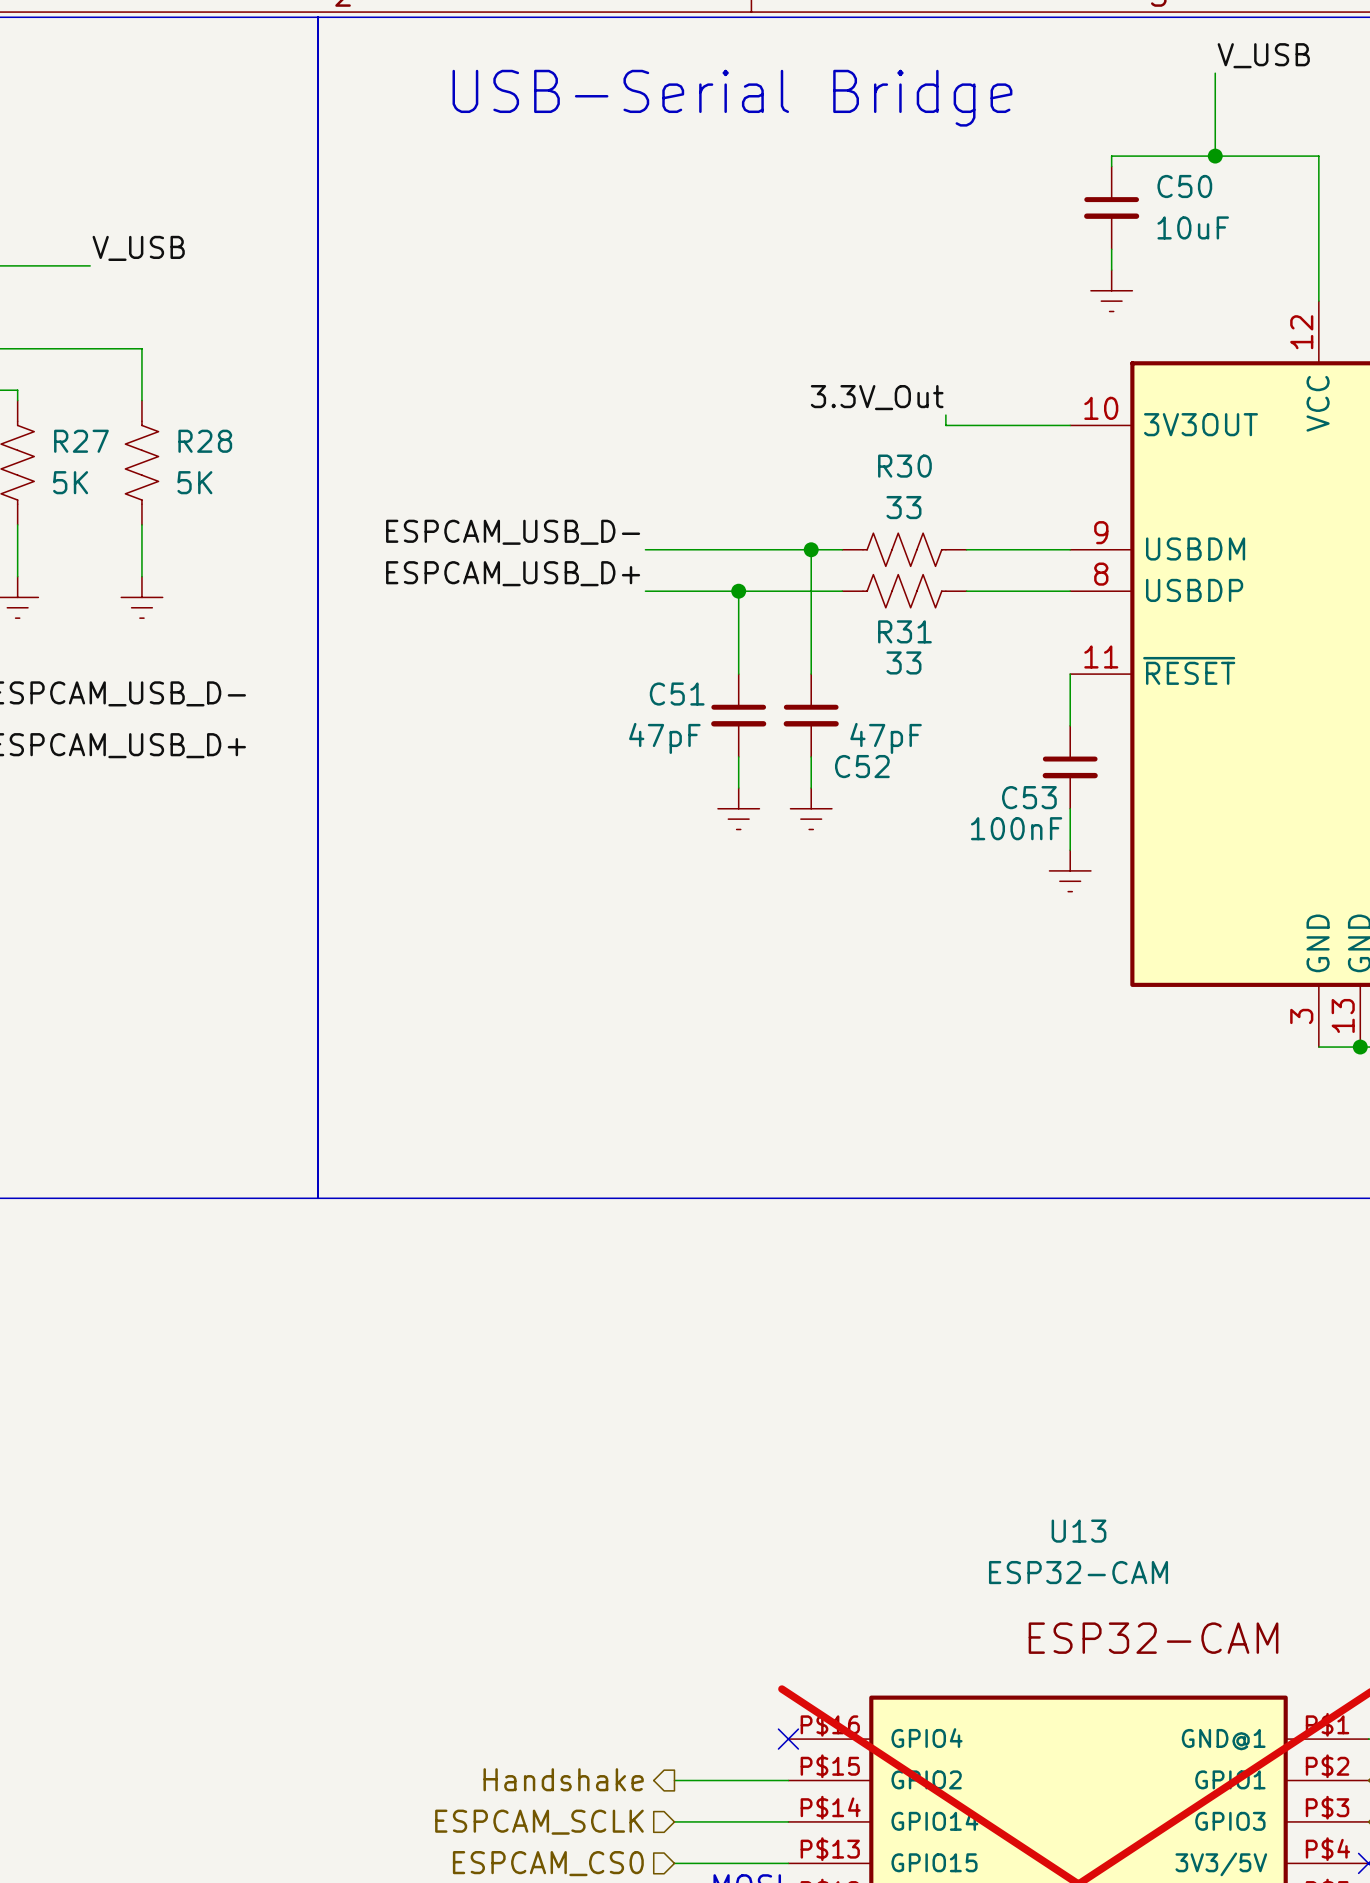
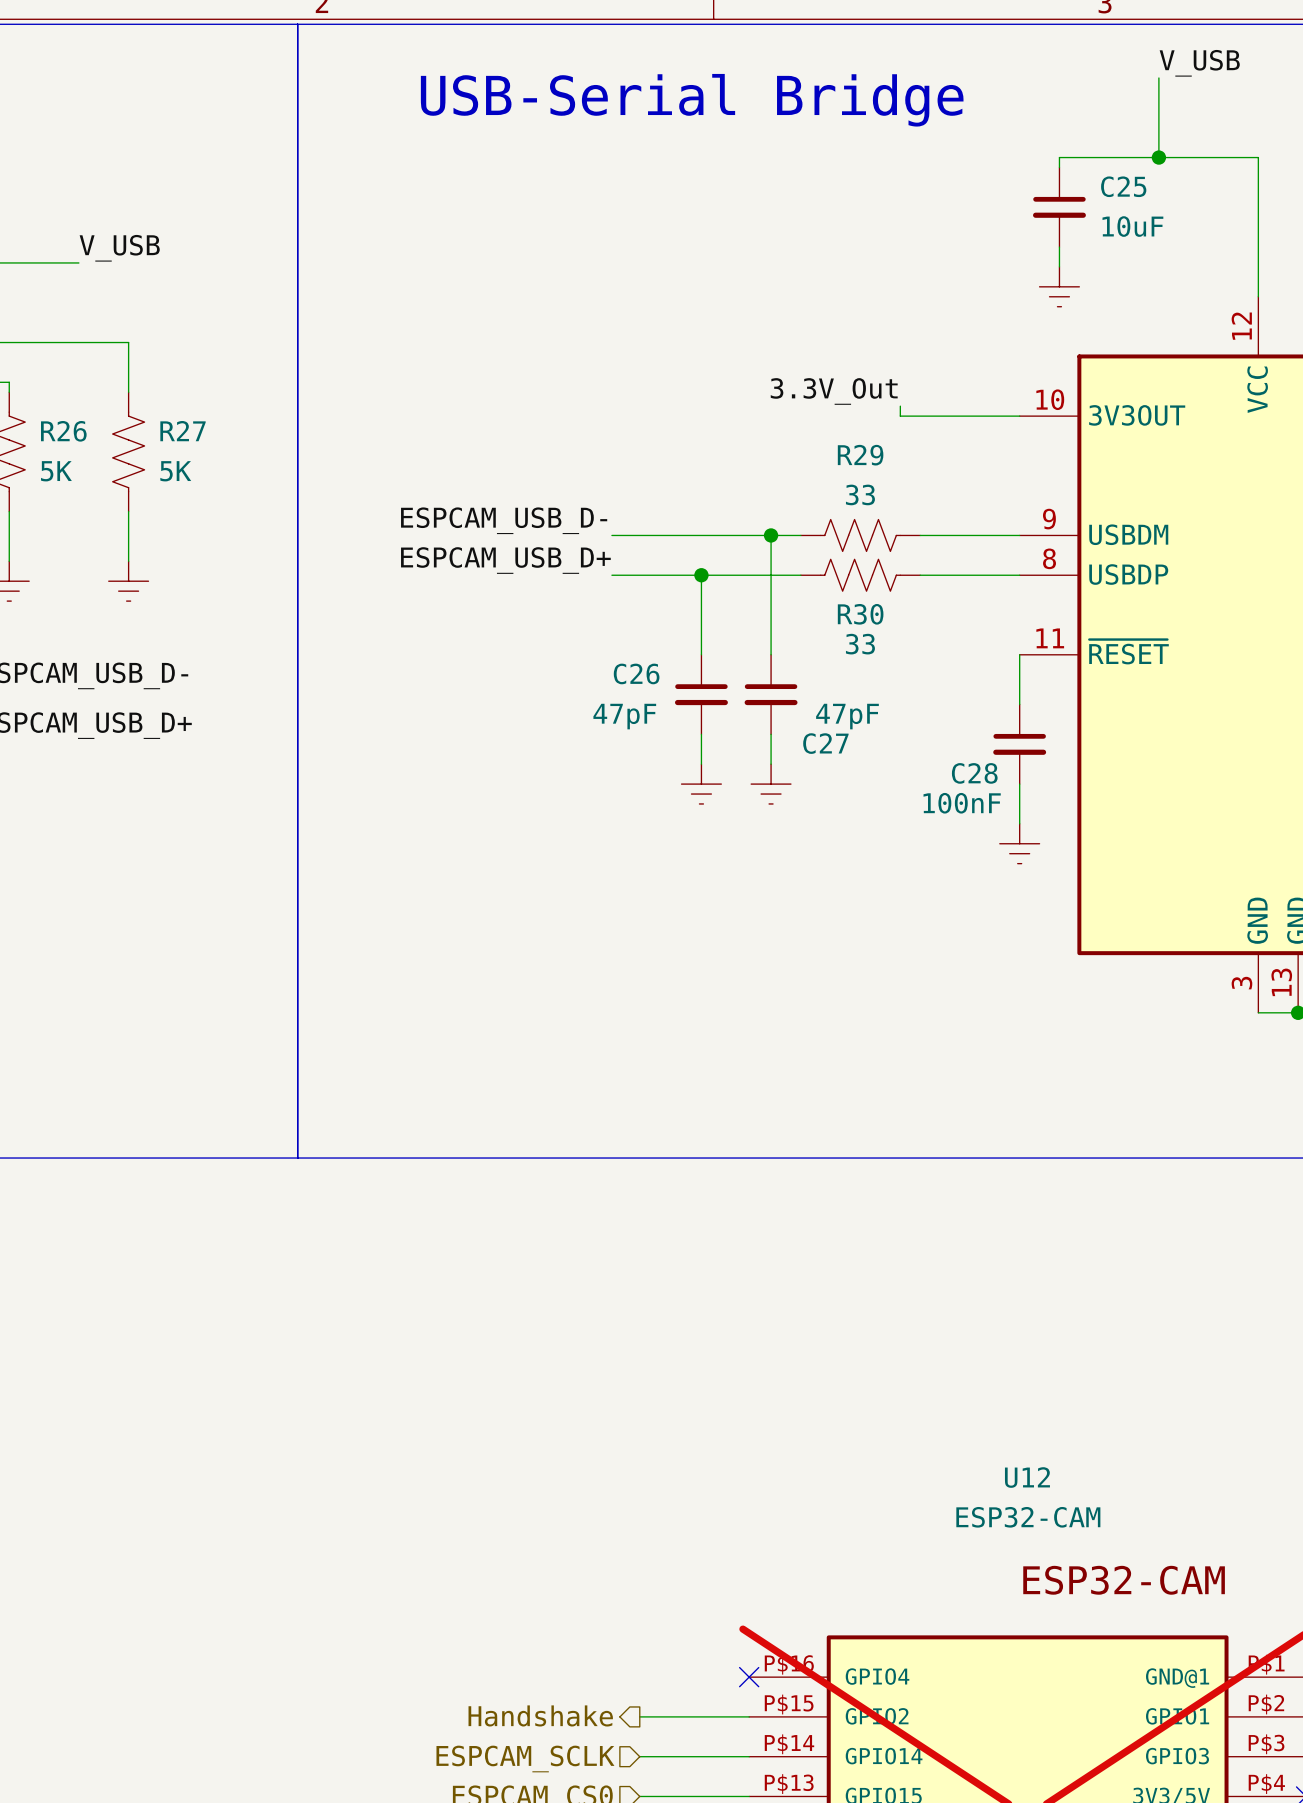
C50 name: C50 (1184, 186) -> C25 (1123, 186)
R27 name: R27 (81, 441) -> R26 (63, 431)
R28 name: R28 (205, 441) -> R27 (183, 431)
R30 name: R30 (904, 466) -> R29 (860, 455)
R31 name: R31 (904, 631) -> R30 (860, 614)
C51 name: C51 (677, 694) -> C26 (636, 673)
C52 name: C52 (862, 766) -> C27 (825, 743)
C53 name: C53 (1029, 797) -> C28 (974, 773)
U13 name: U13 (1078, 1531) -> U12 (1027, 1477)

